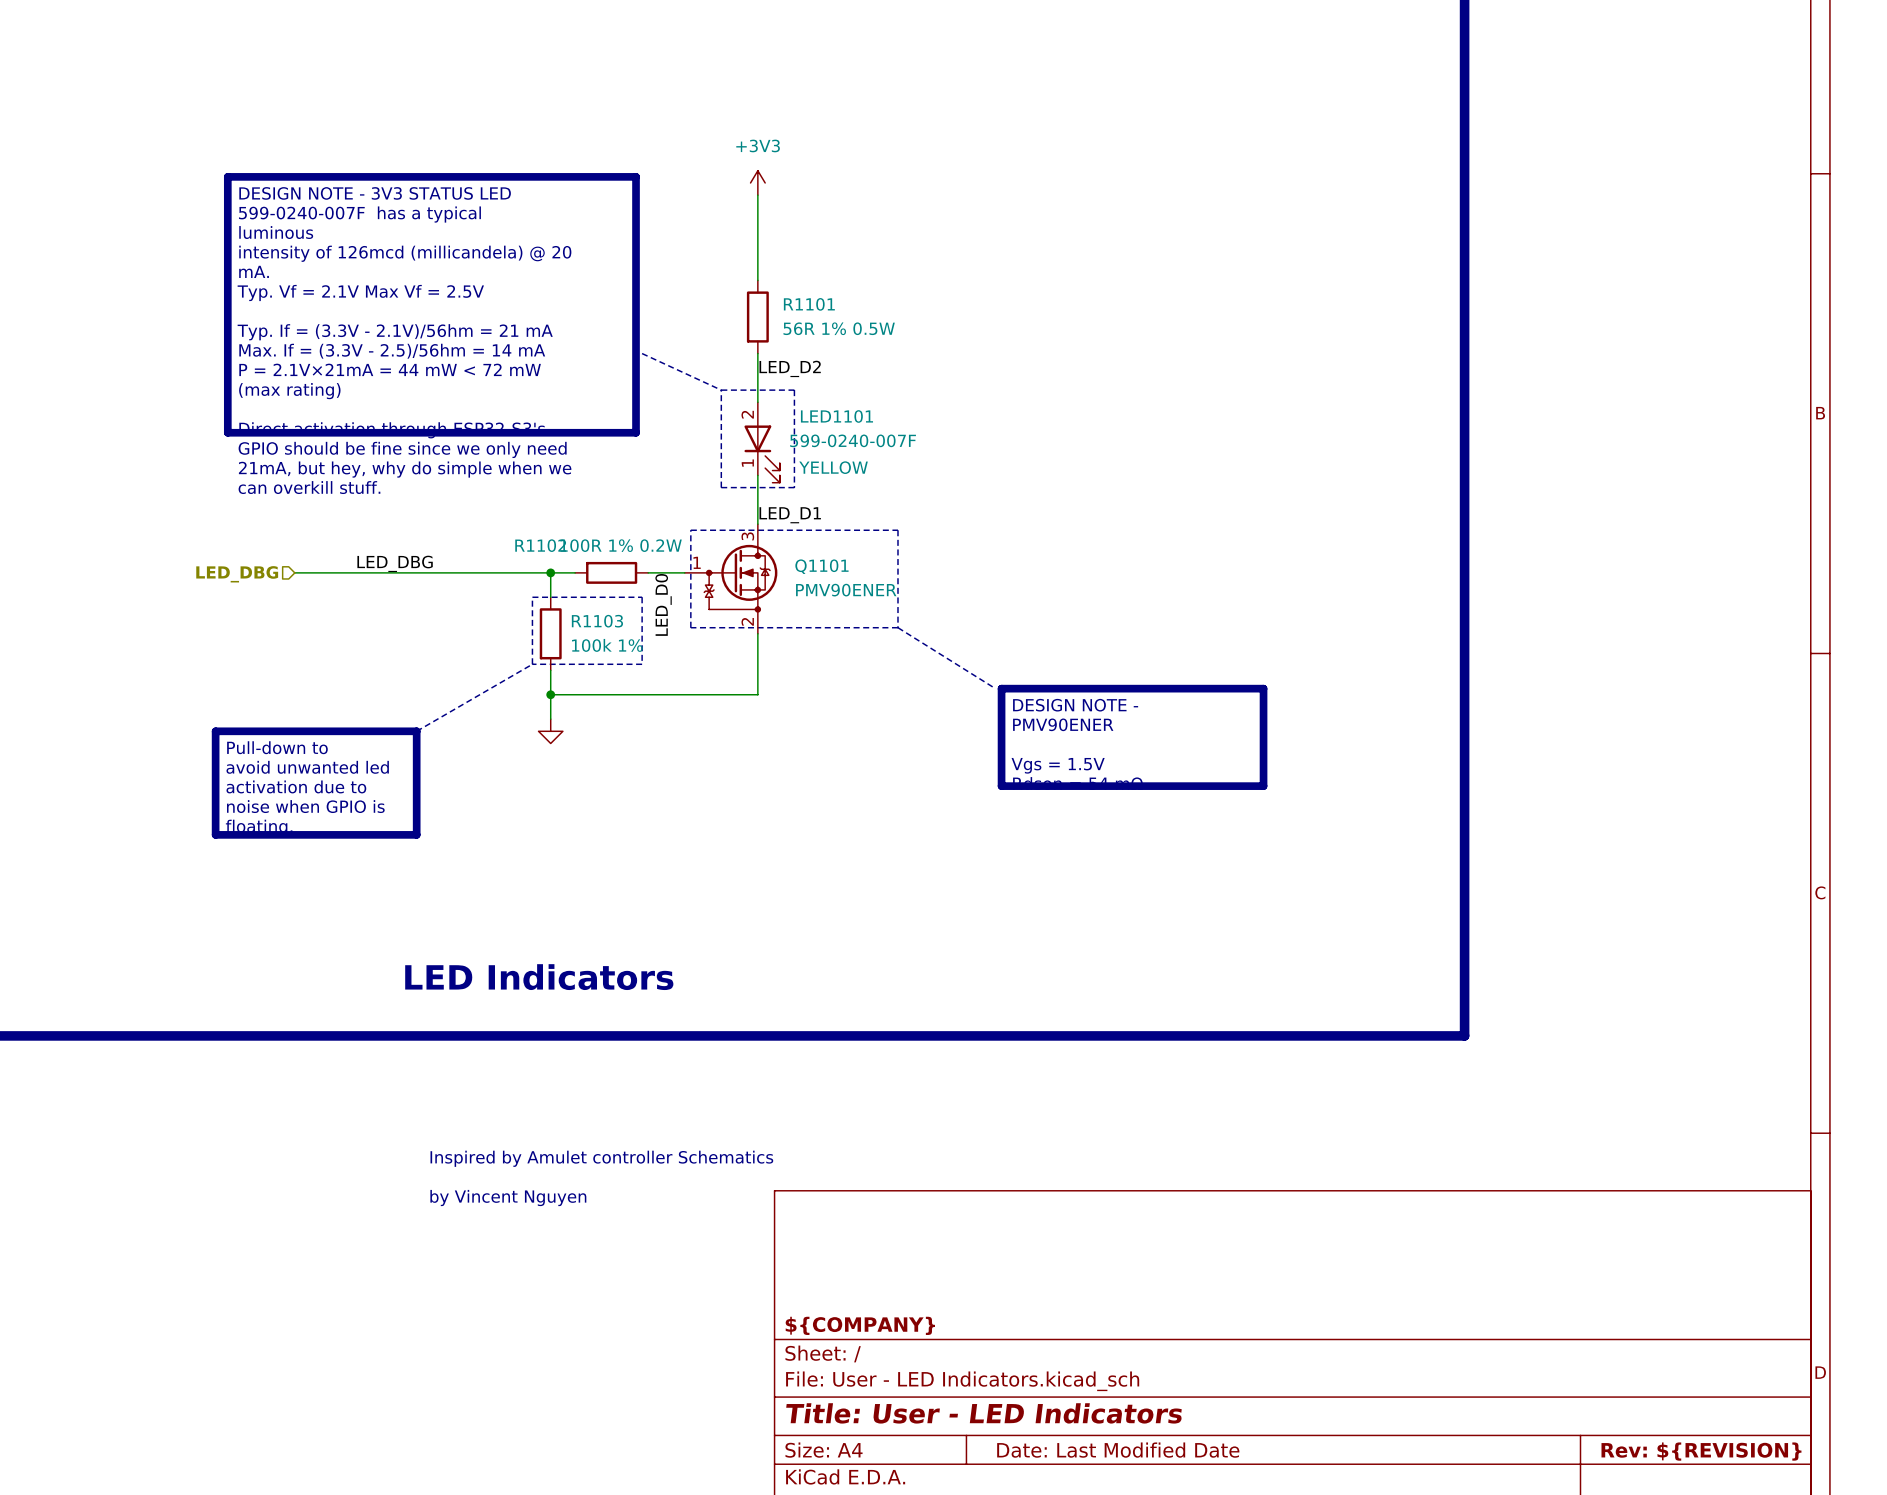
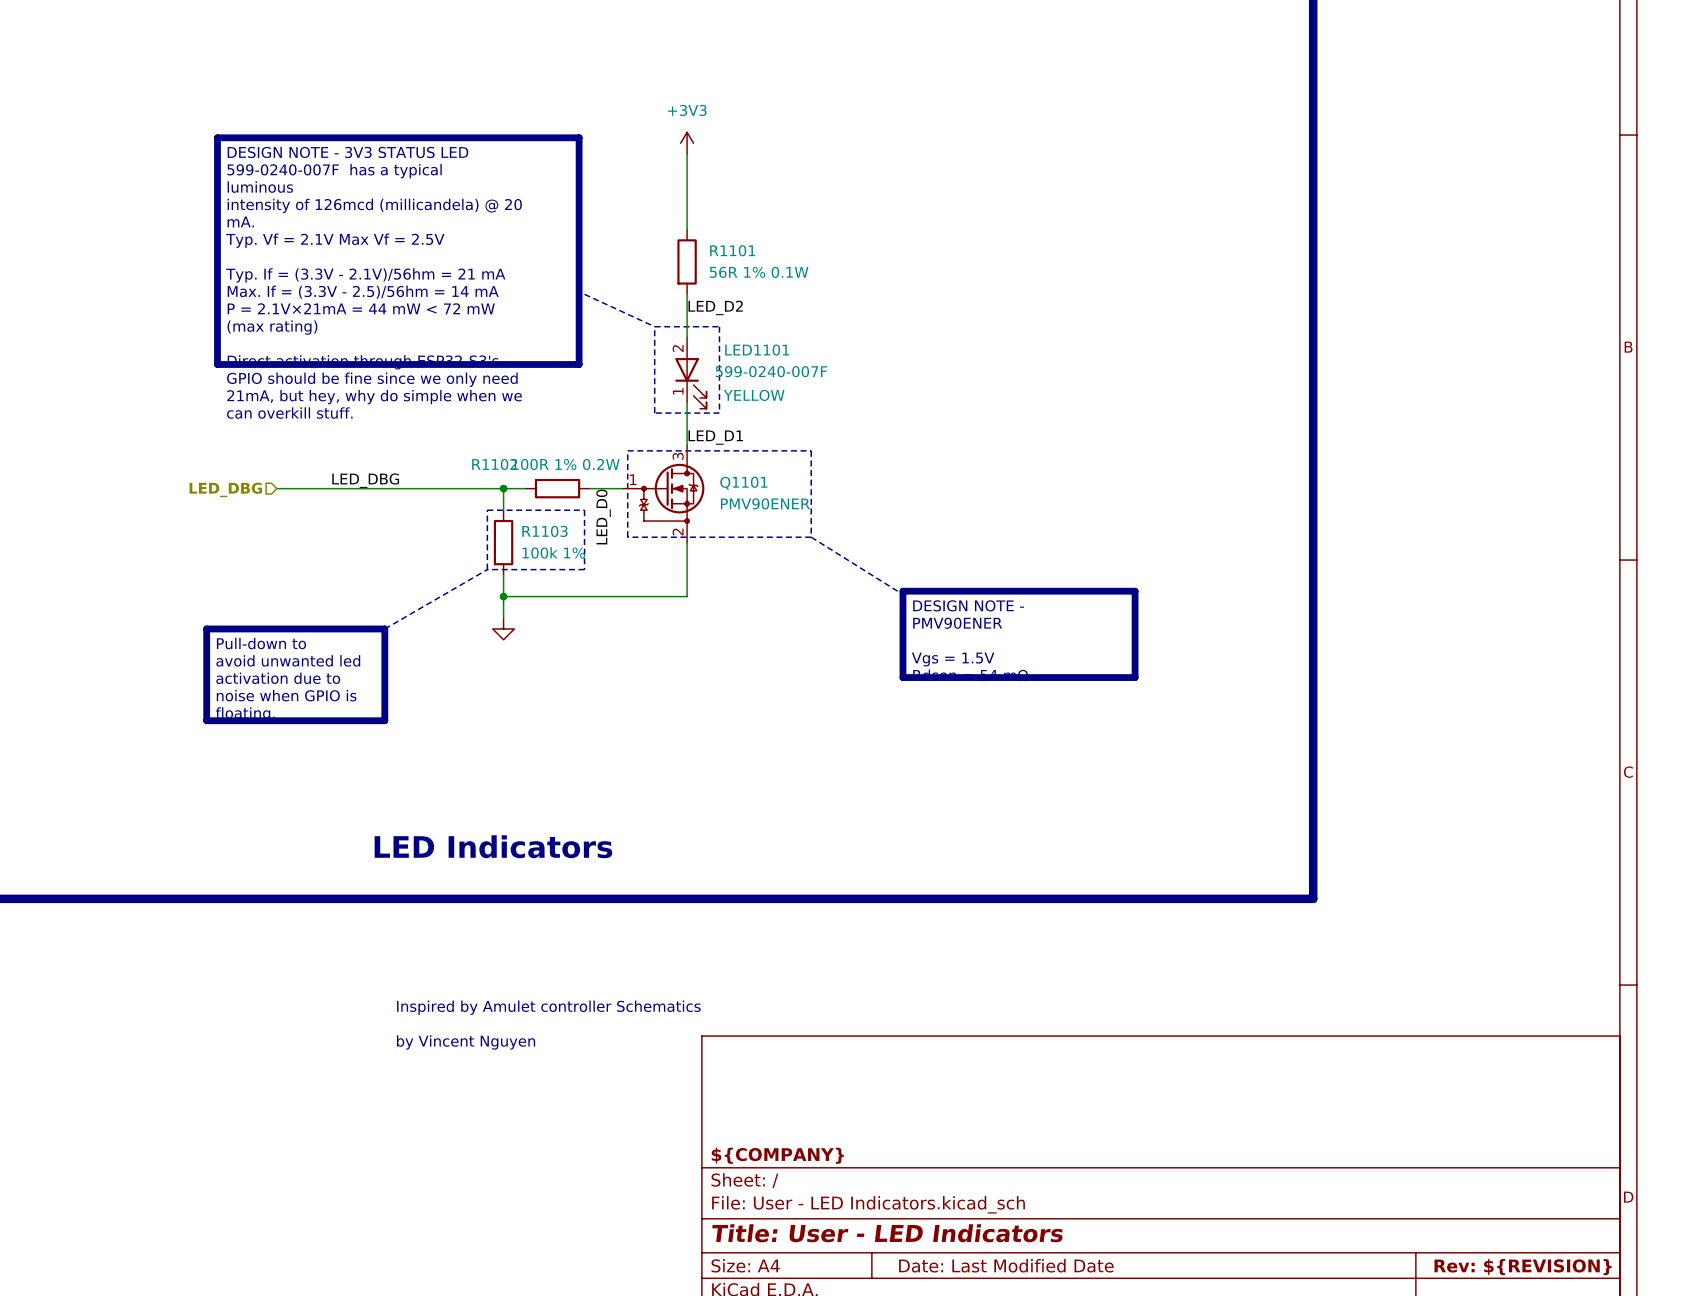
R1101 value: 56R 1% 0.5W (839, 328) -> 56R 1% 0.1W (759, 272)

